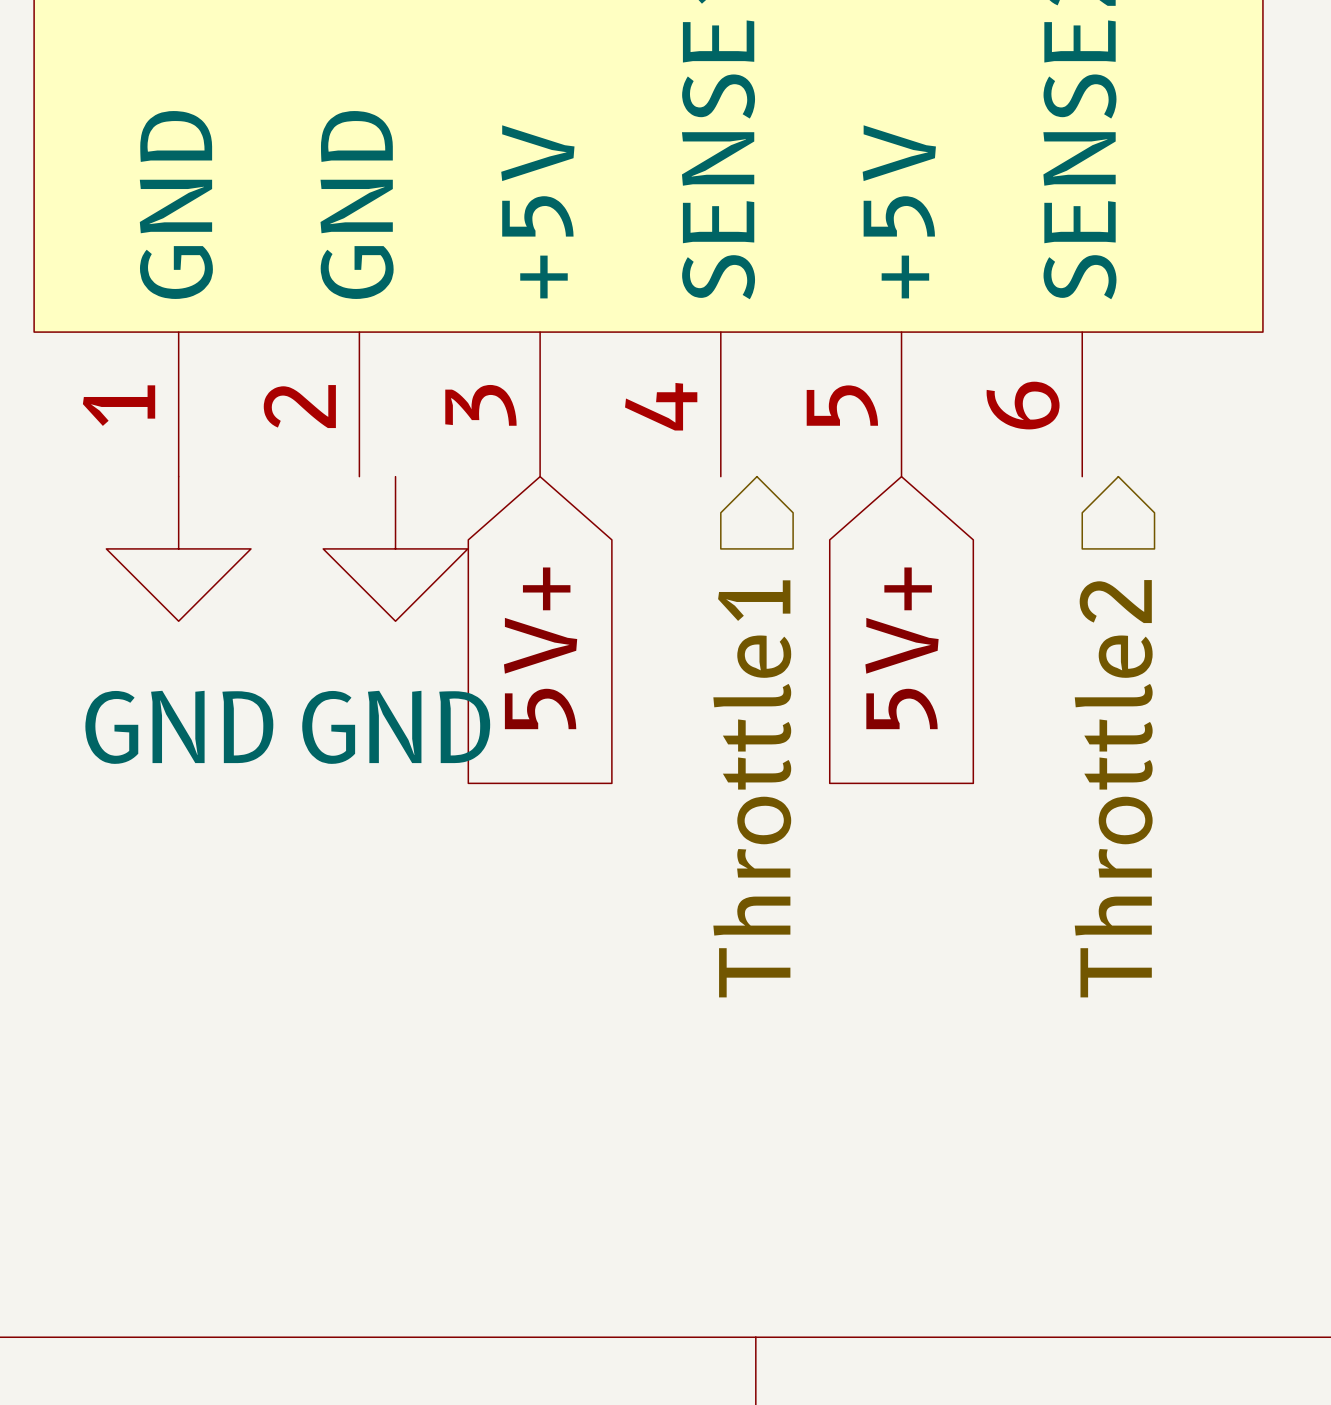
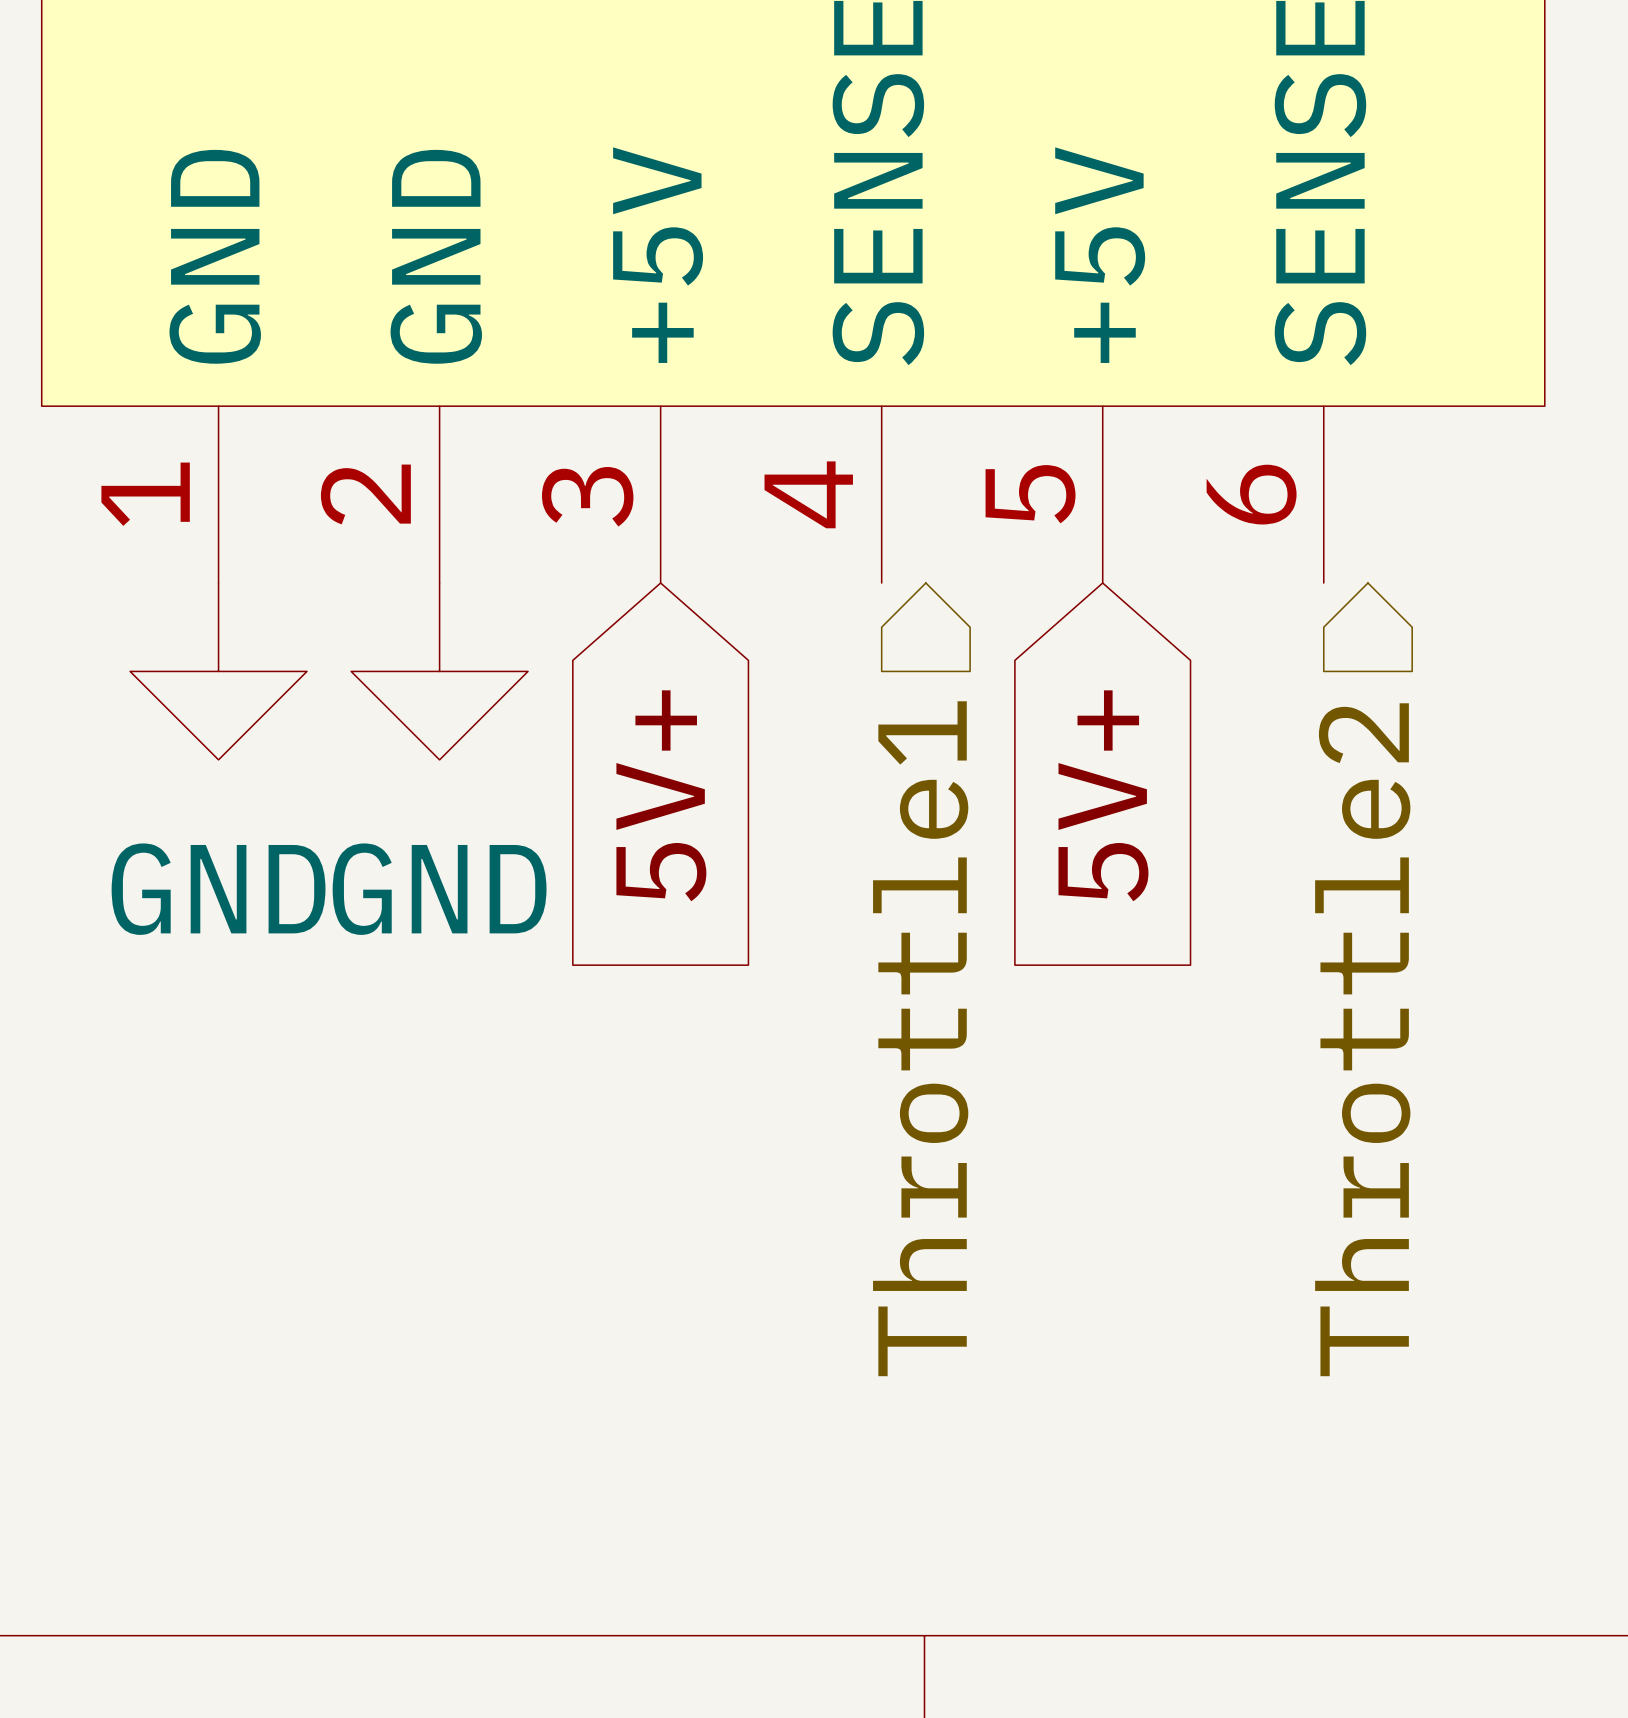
power symbol position: GND (395, 548) -> GND (439, 671)

